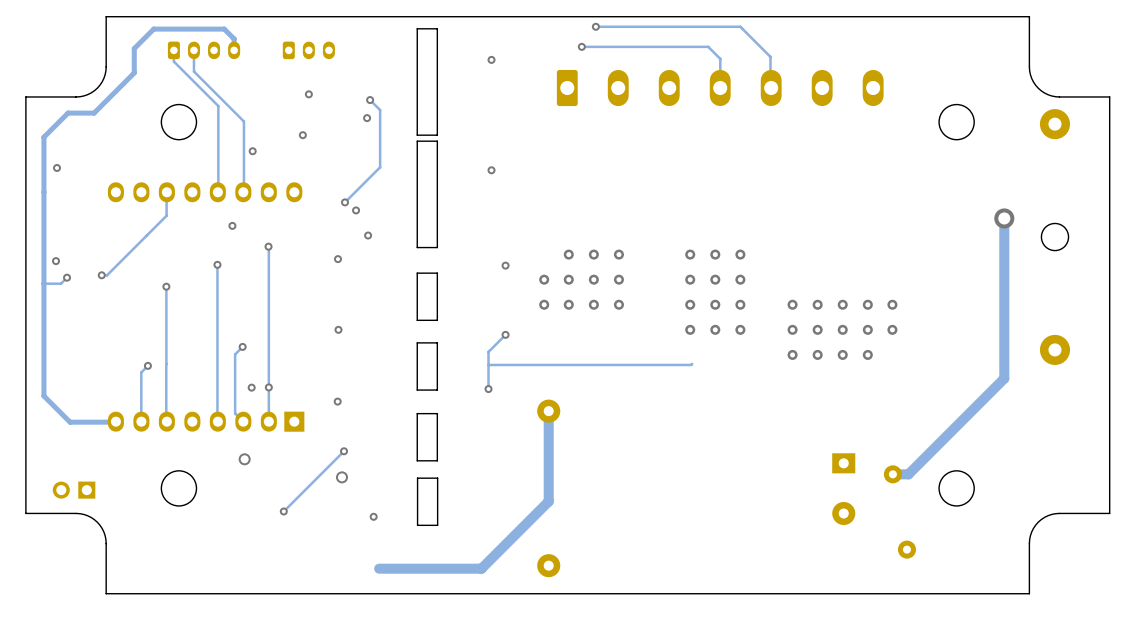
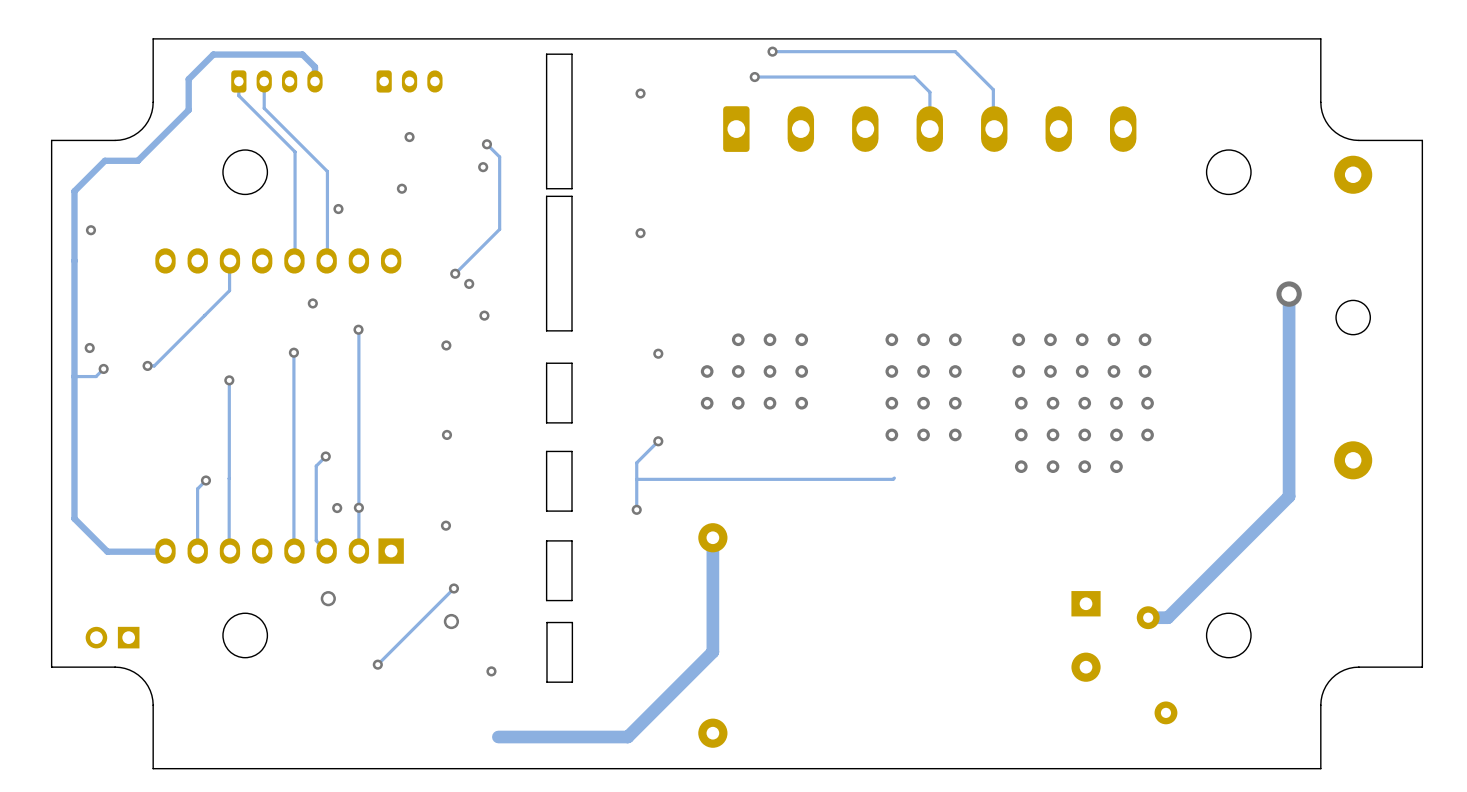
via: none -> (1018, 339)
via: none -> (1050, 339)
via: none -> (1082, 339)
via: none -> (1113, 339)
via: none -> (1145, 339)
via: none -> (1018, 371)
via: none -> (1050, 371)
via: none -> (1082, 371)
via: none -> (1113, 371)
via: none -> (1145, 371)

